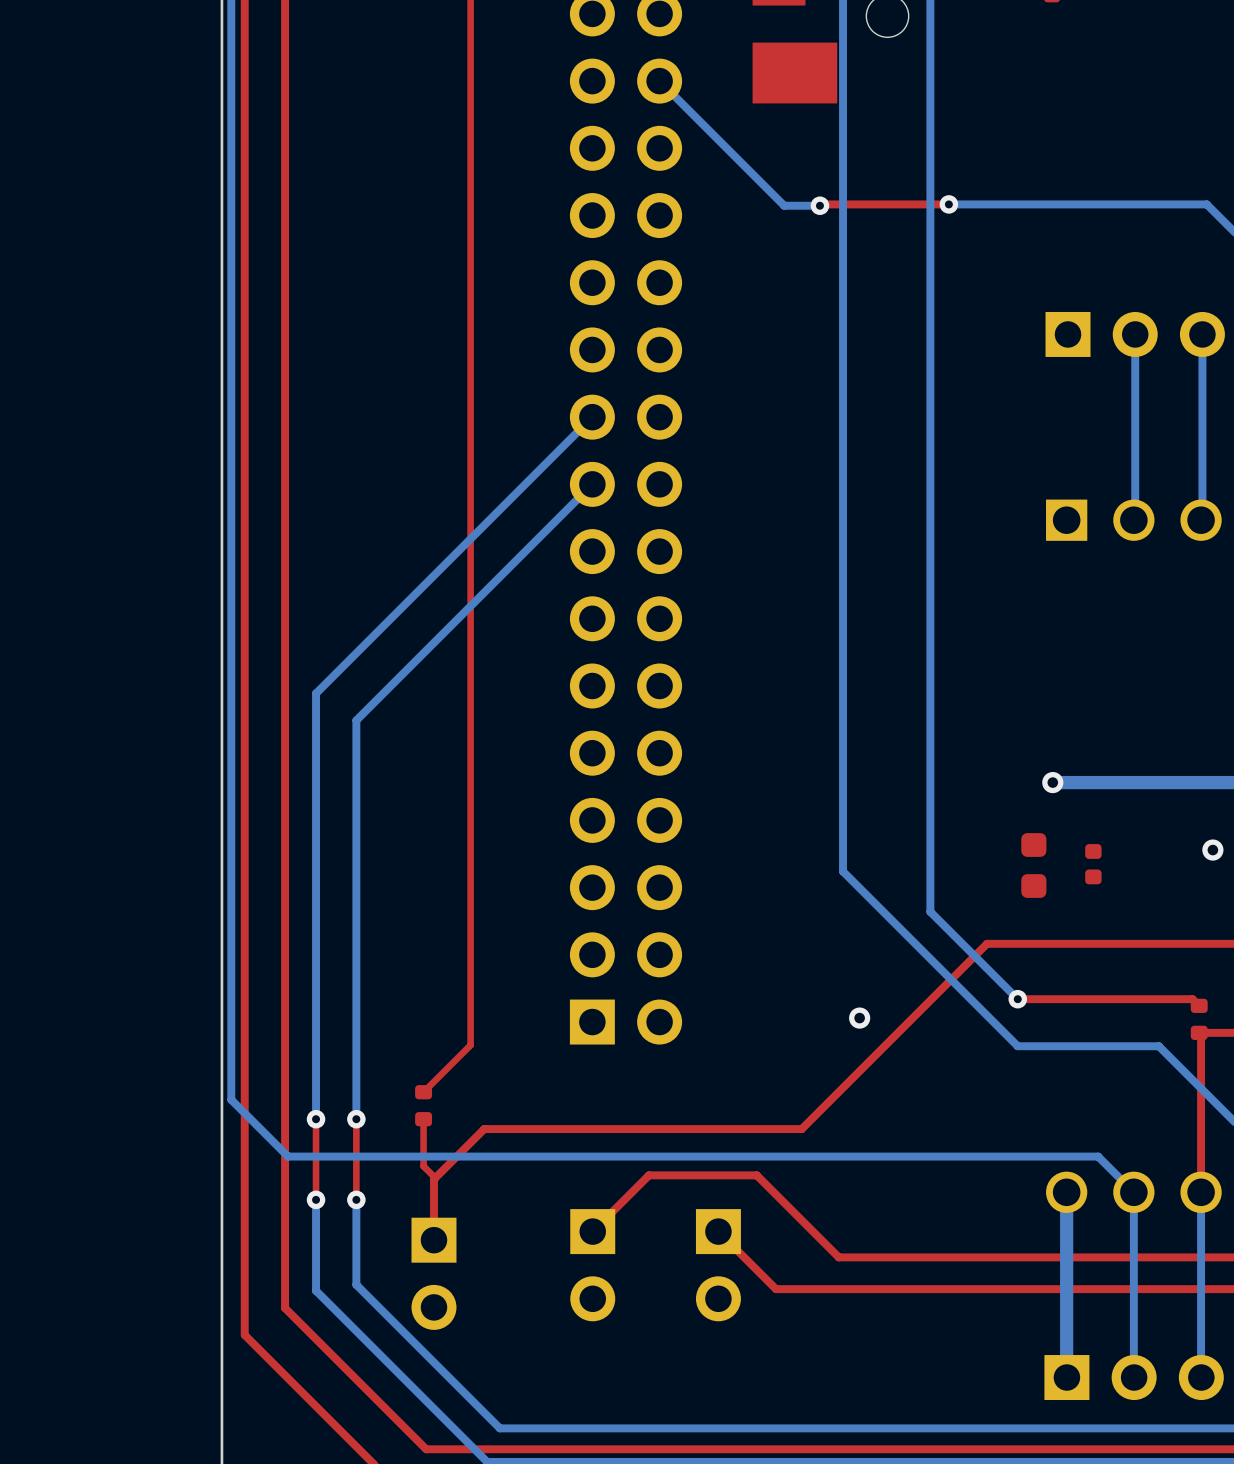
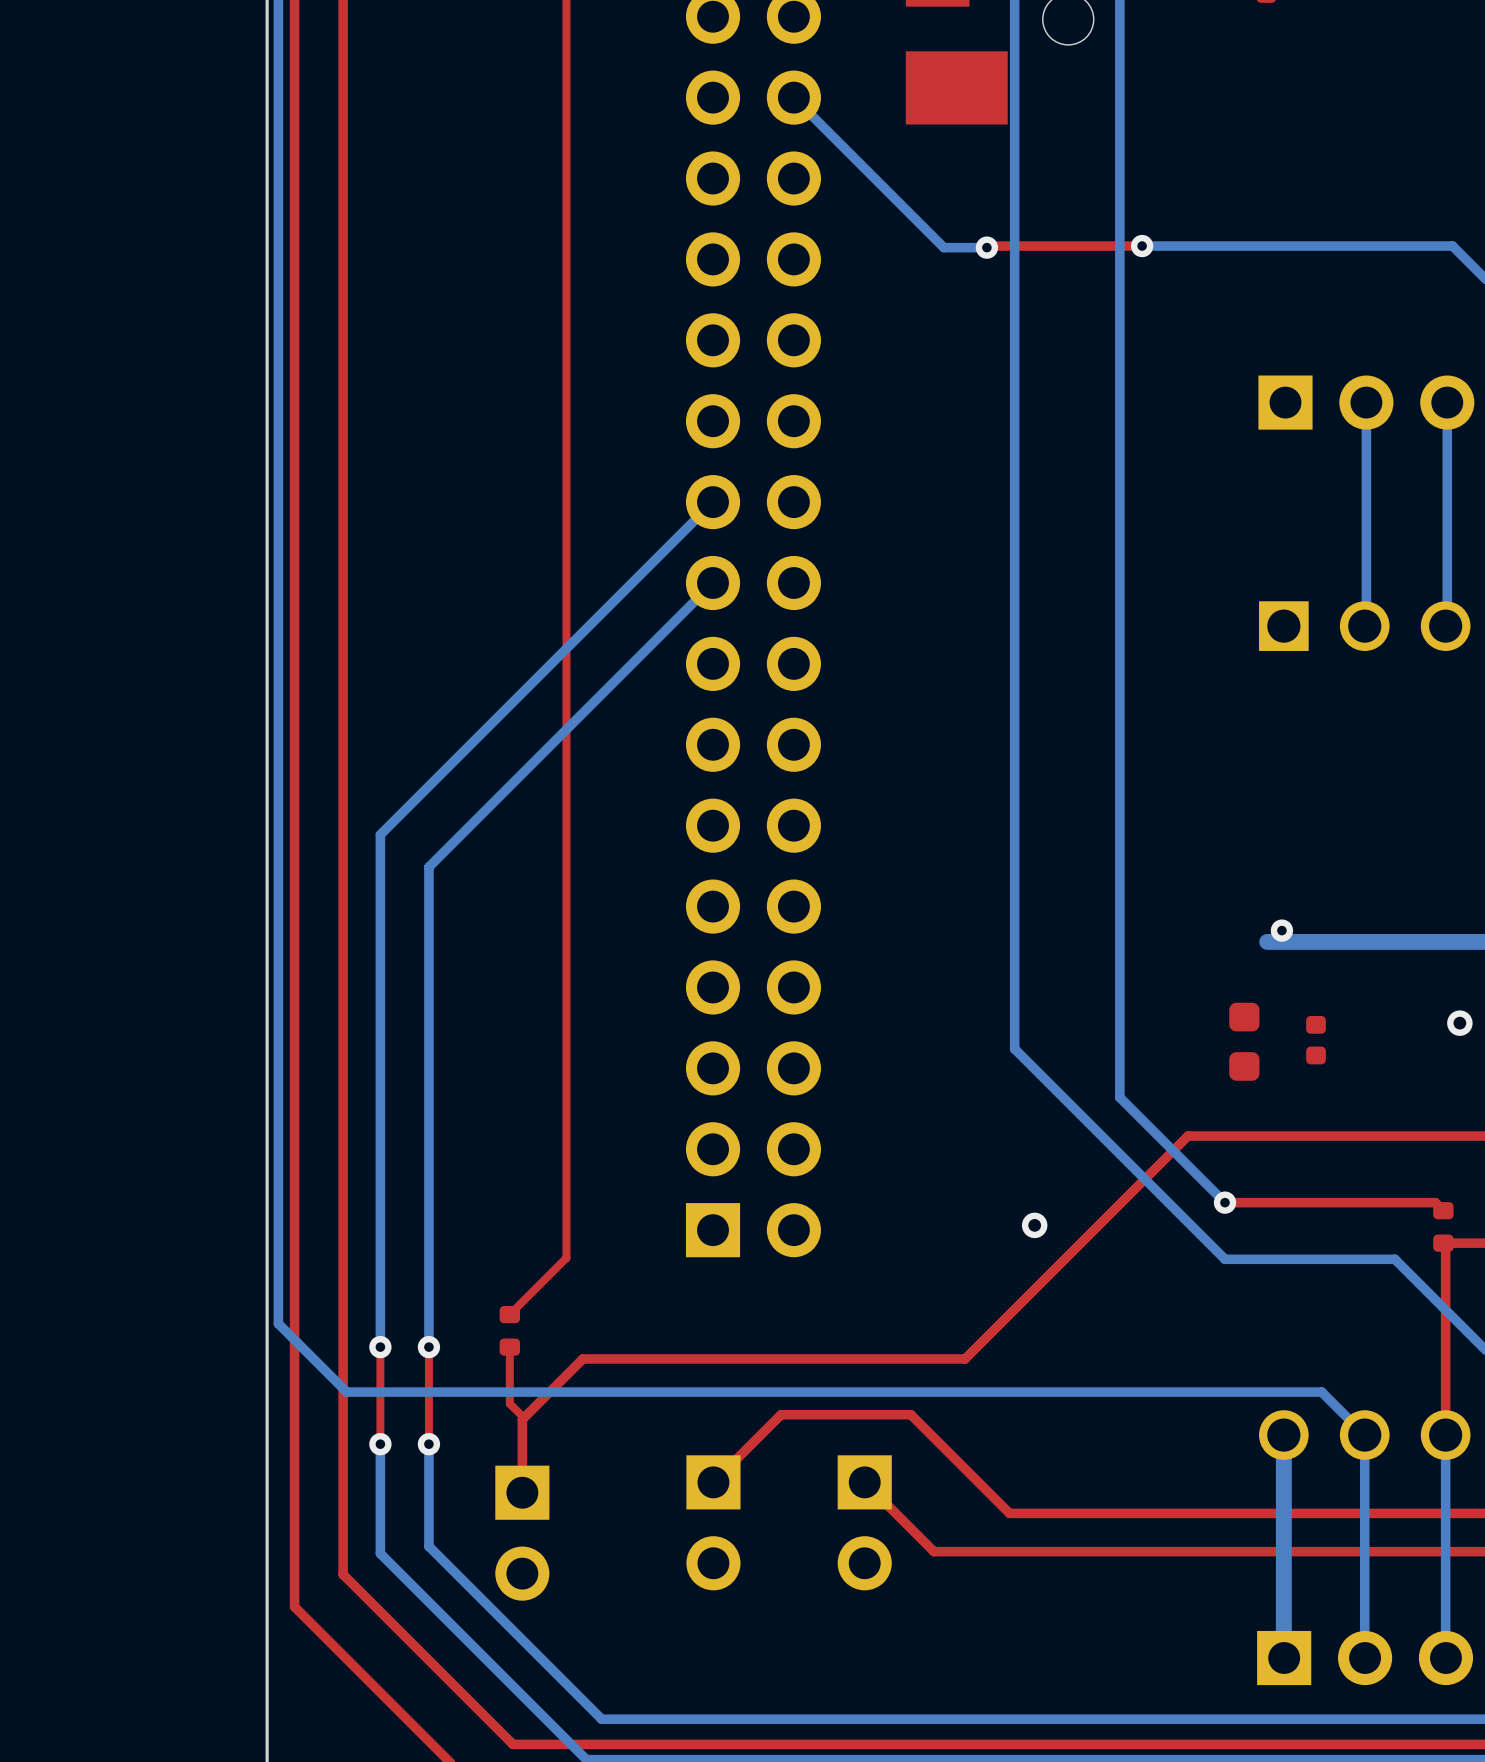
via position: (1052, 782) -> (1281, 930)

